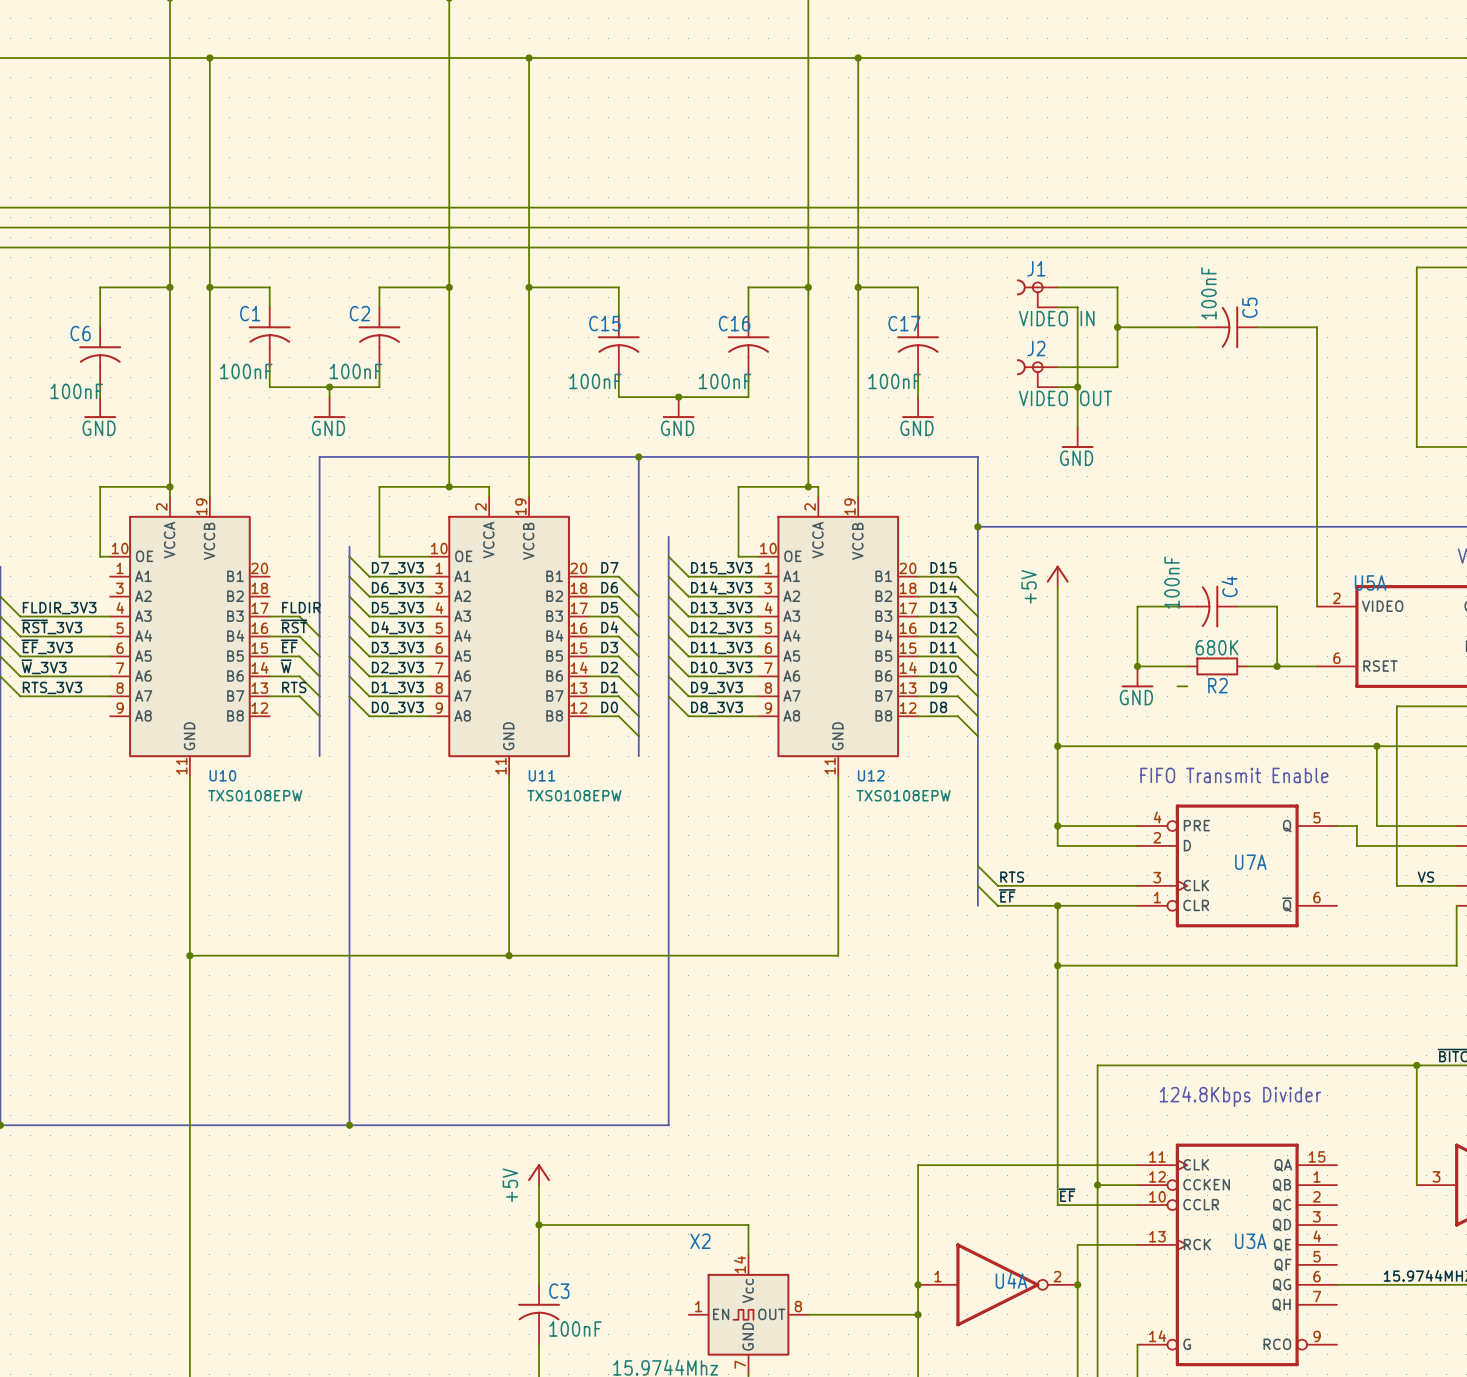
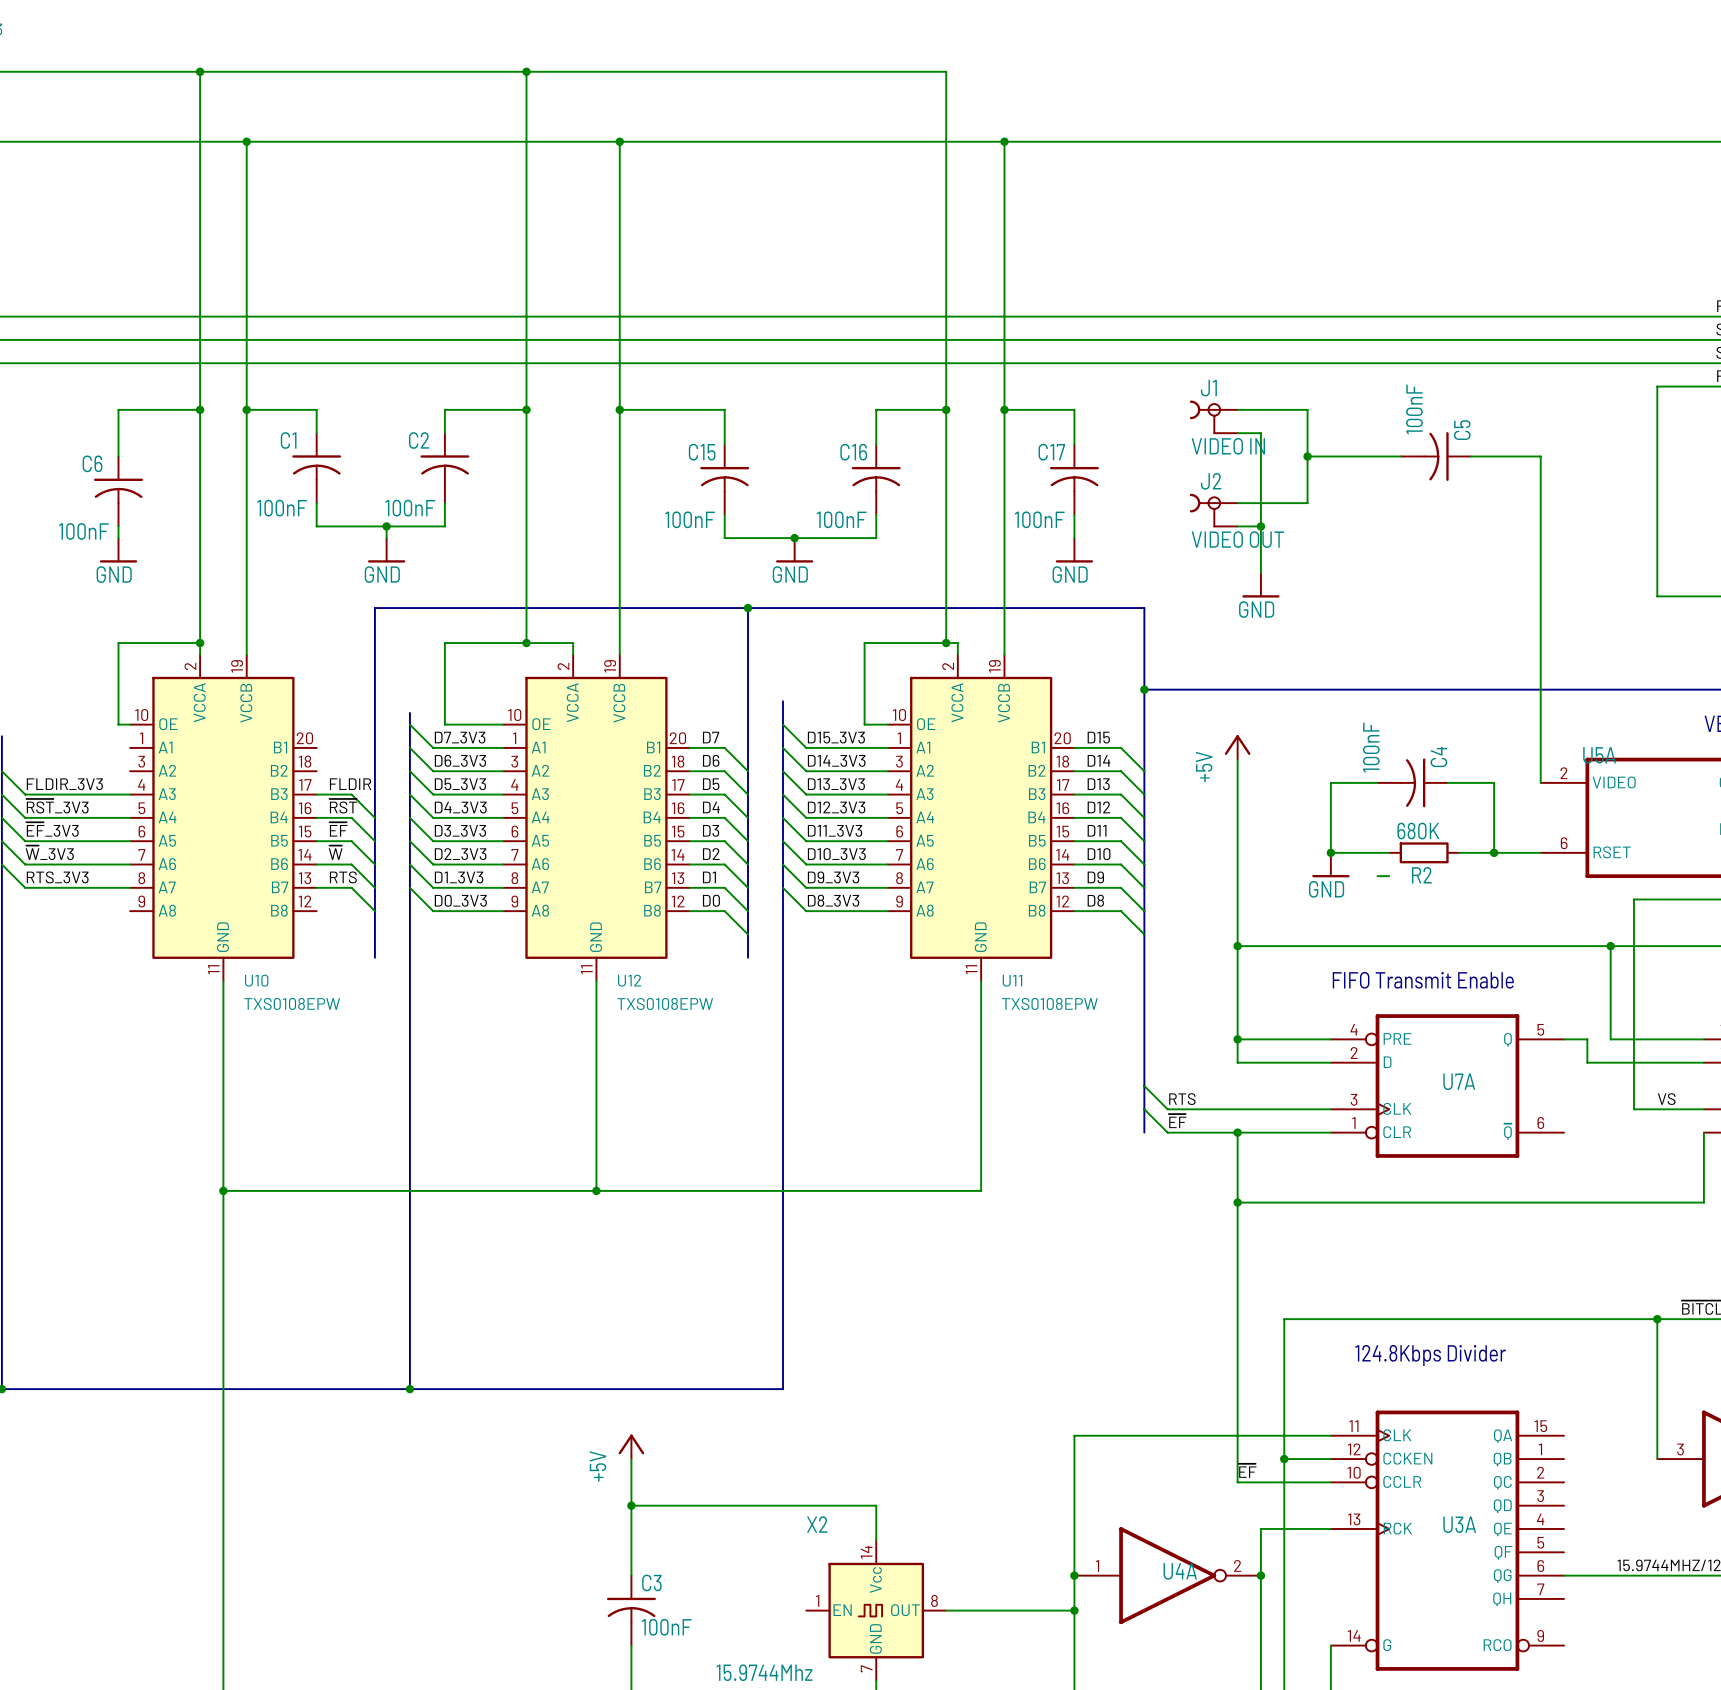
U11 name: U11 (542, 775) -> U12 (629, 980)
U12 name: U12 (871, 775) -> U11 (1012, 980)

